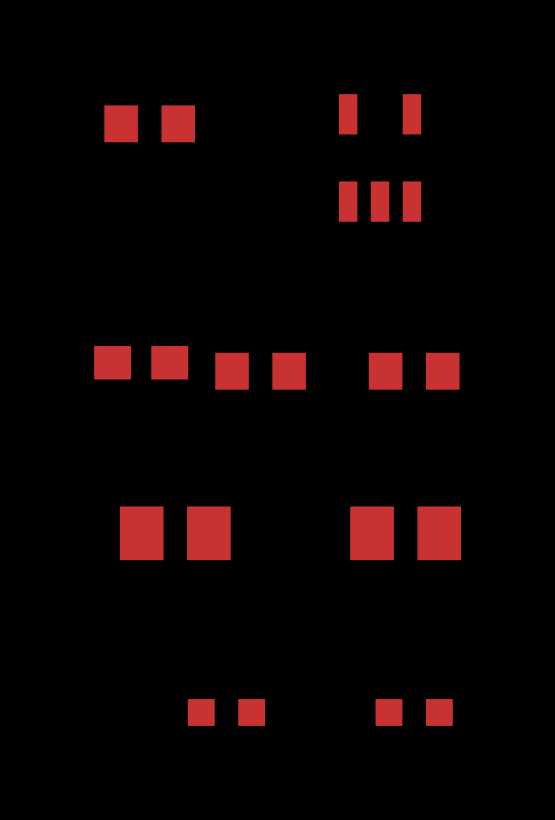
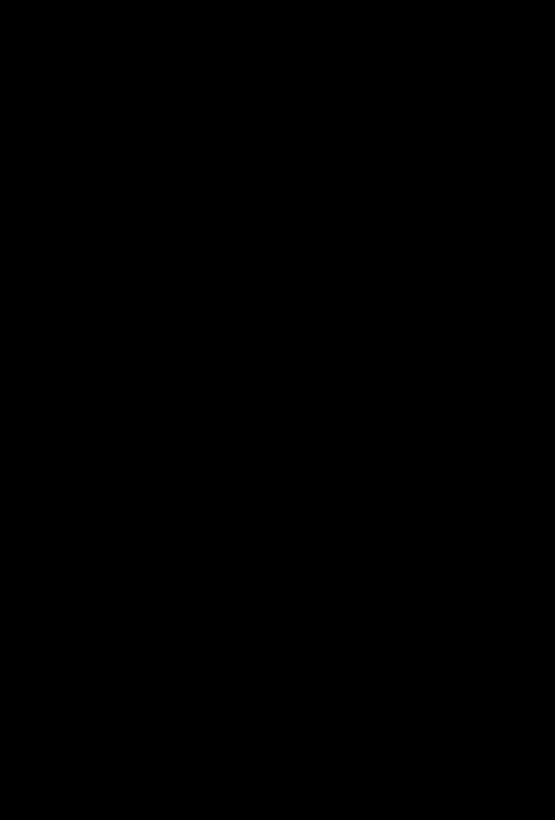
part: (149, 123) -> none
part: (380, 157) -> none
part: (141, 362) -> none
part: (260, 371) -> none
part: (414, 371) -> none
part: (175, 533) -> none
part: (405, 533) -> none
part: (226, 712) -> none
part: (414, 712) -> none

